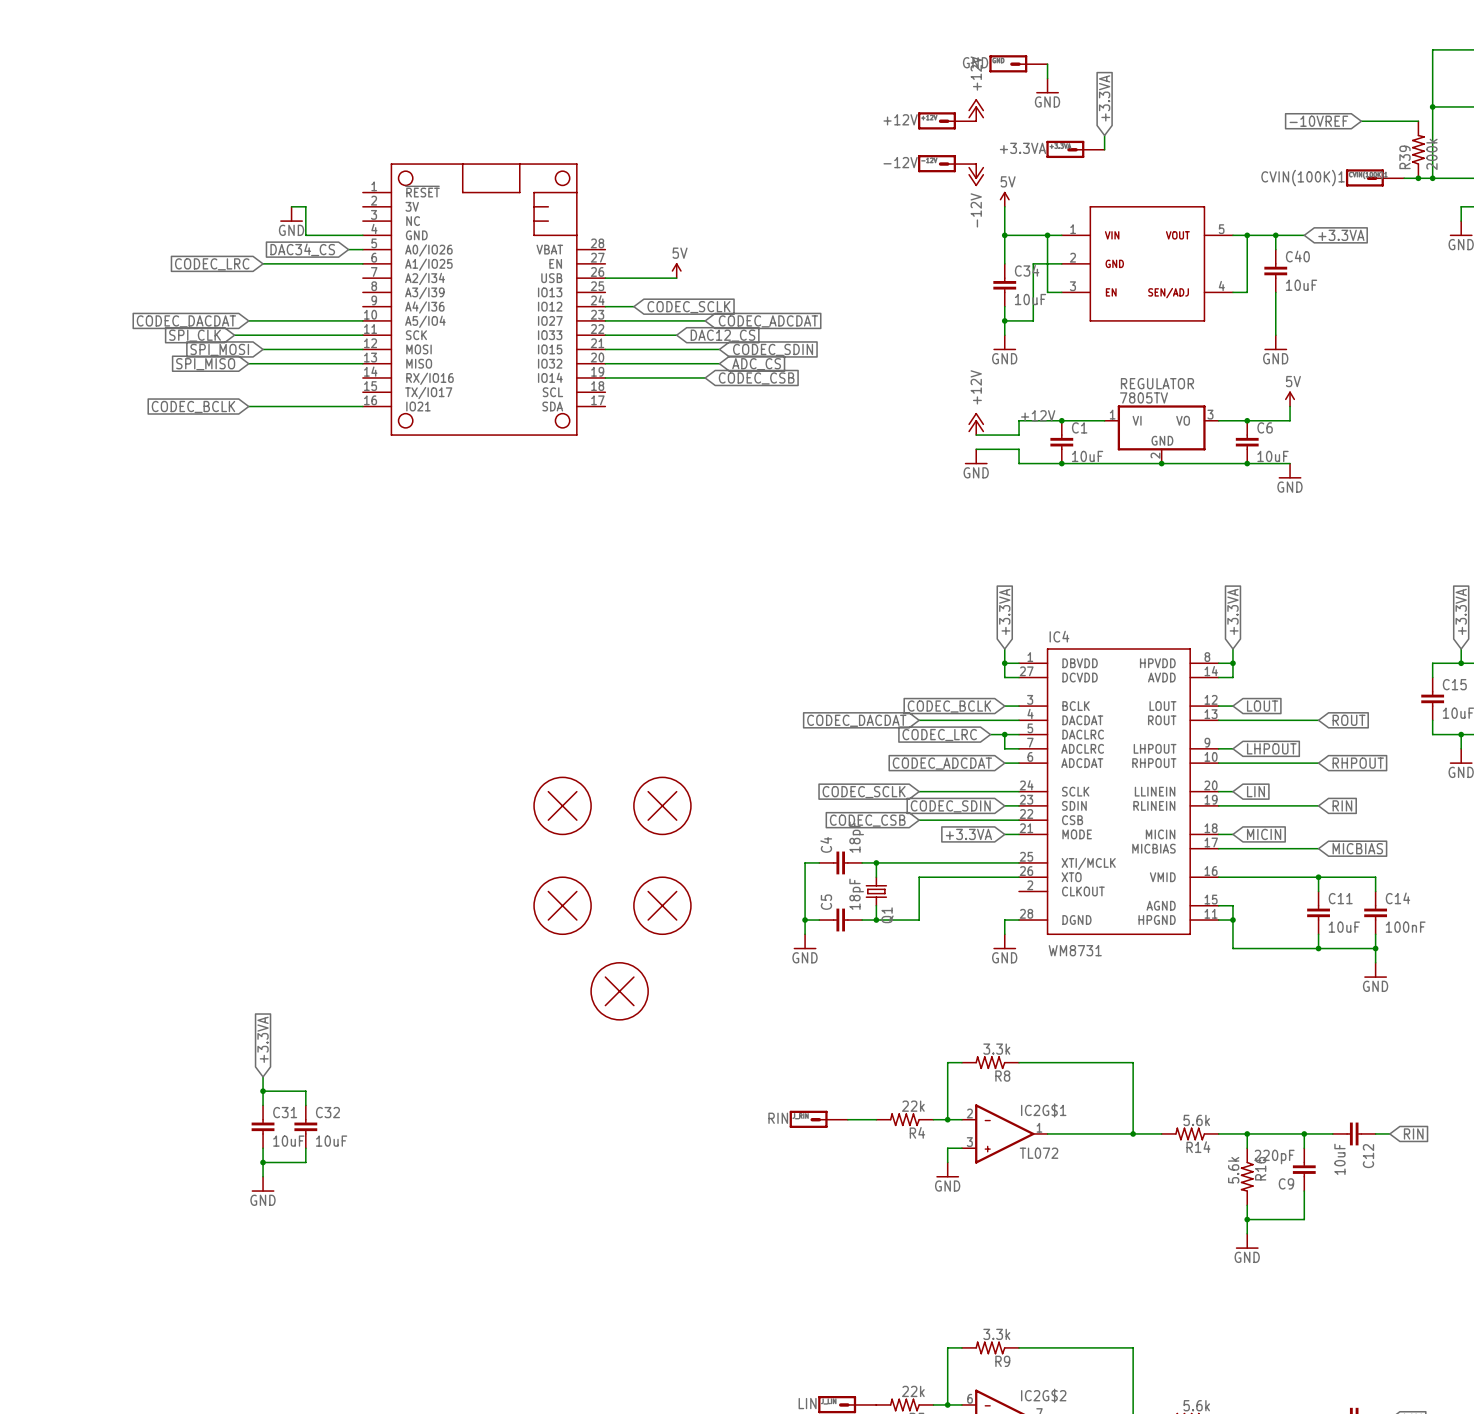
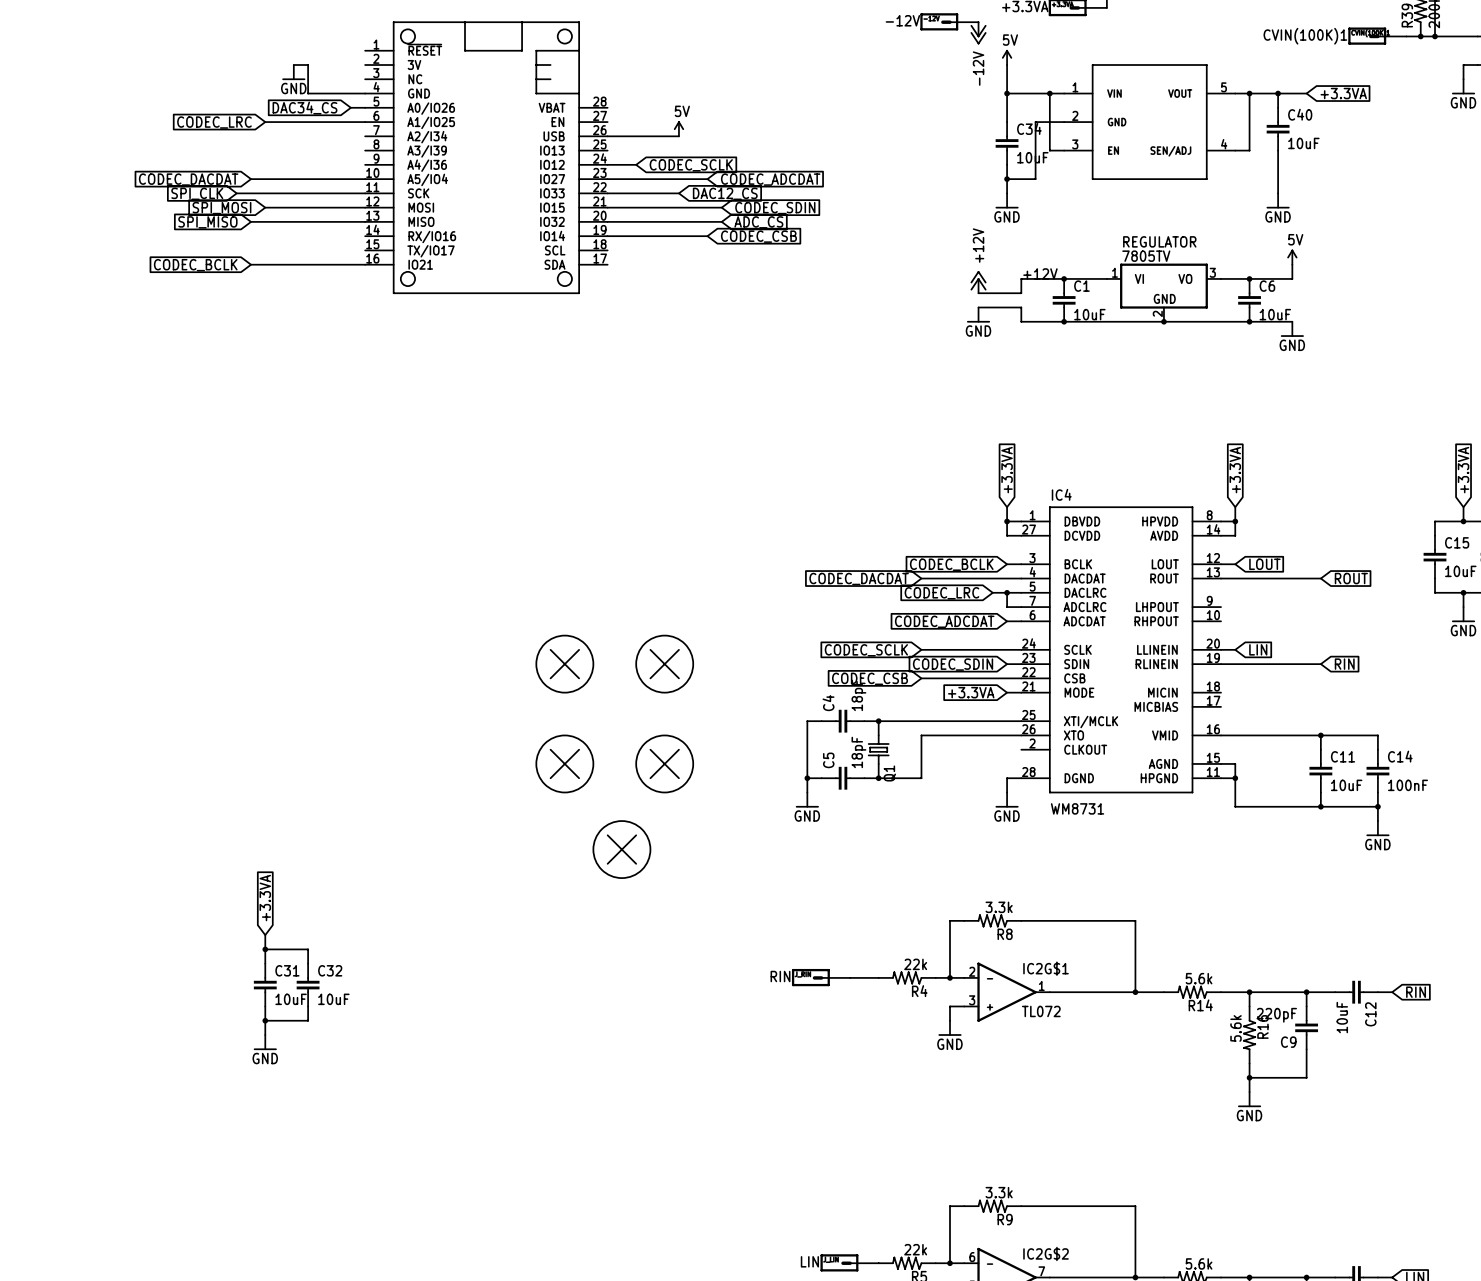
wire: (1218, 748) (1232, 748) -> none
global label: LHPOUT (1271, 748) -> none
wire: (1218, 763) (1318, 763) -> none
global label: RHPOUT (1358, 763) -> none
wire: (1218, 834) (1232, 834) -> none
global label: MICIN (1264, 834) -> none
wire: (1218, 848) (1318, 848) -> none
global label: MICBIAS (1357, 848) -> none

